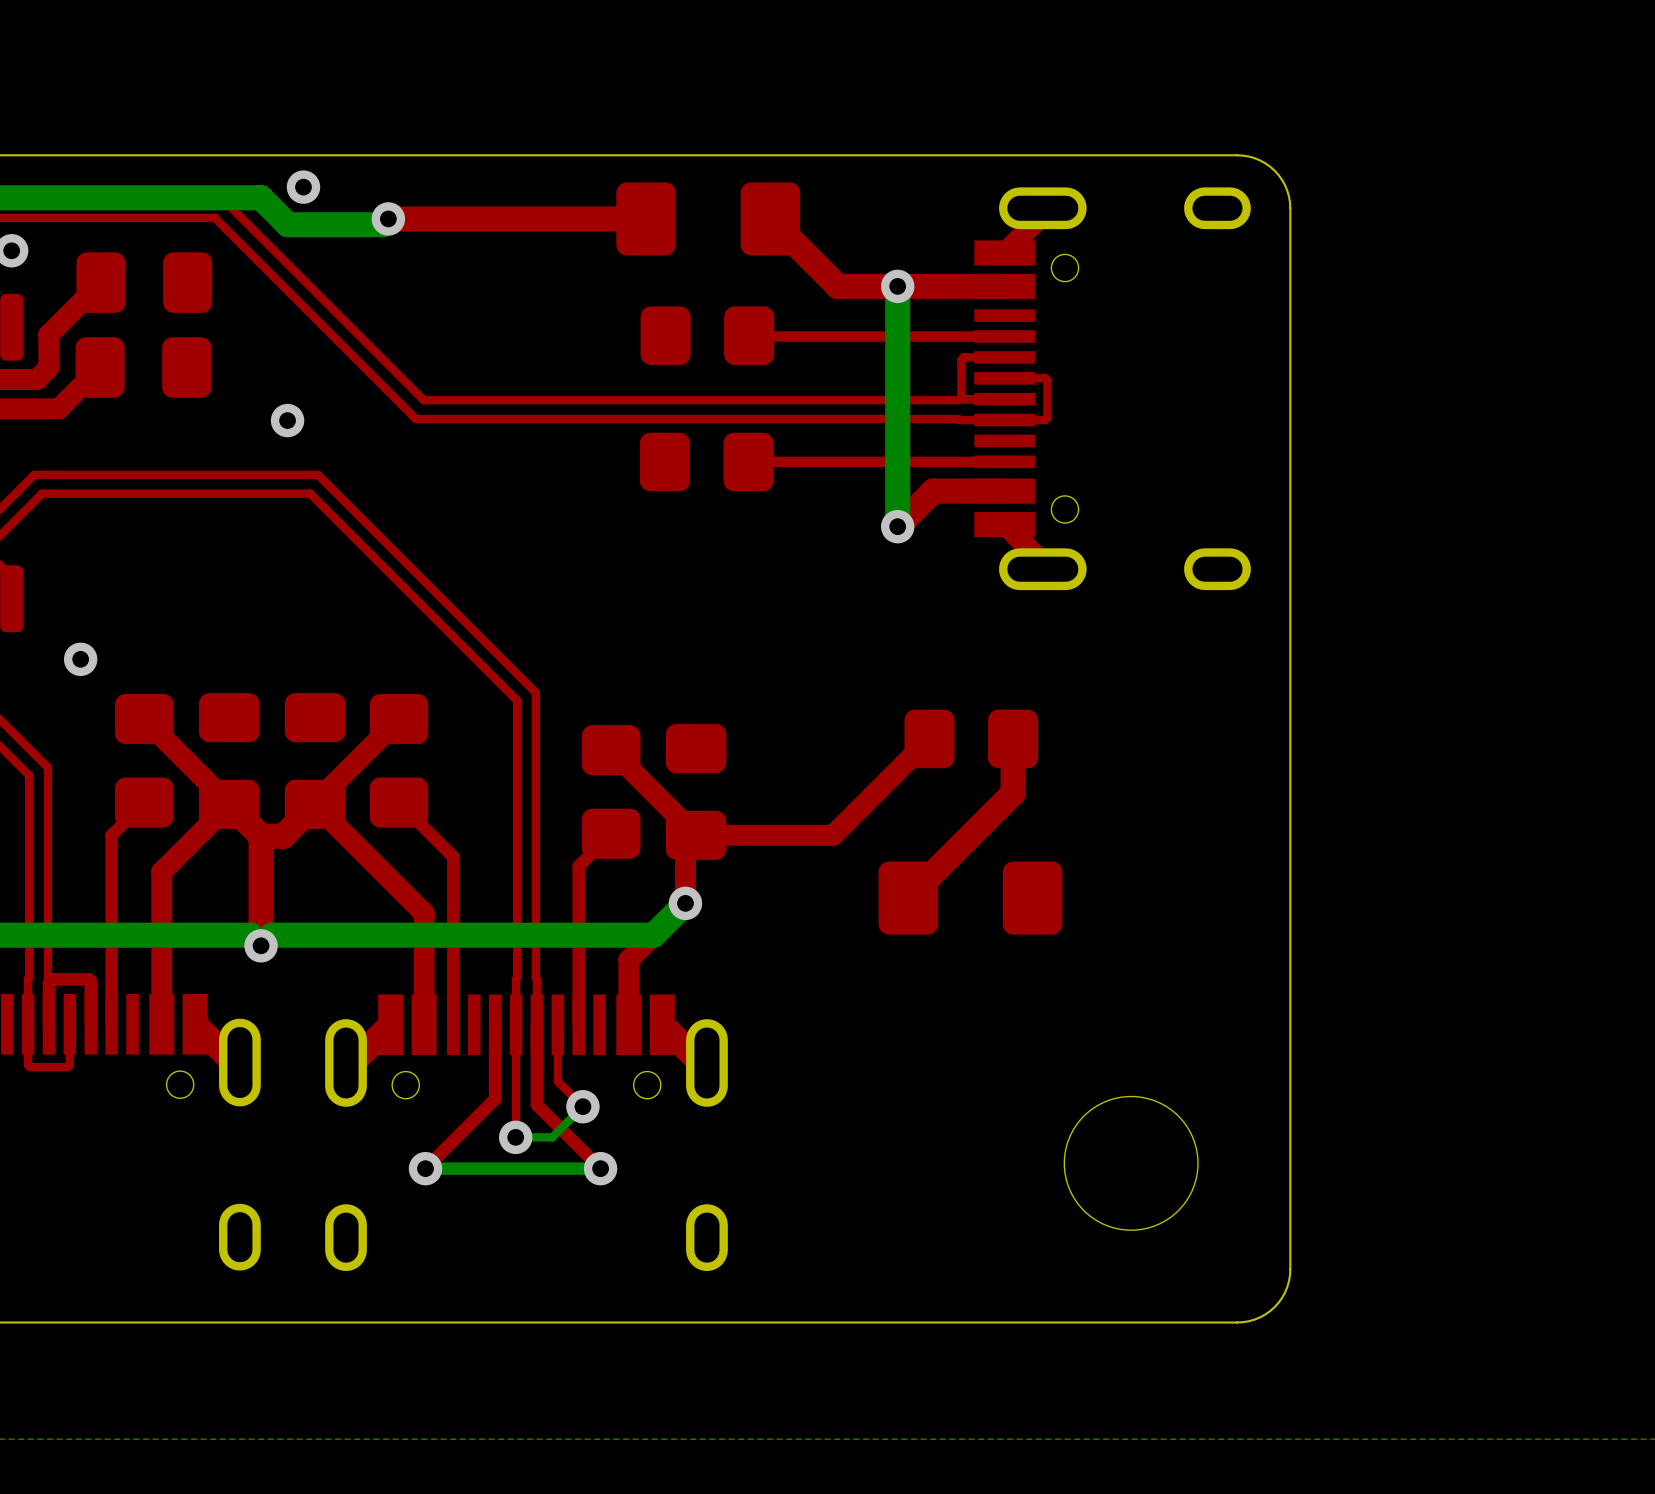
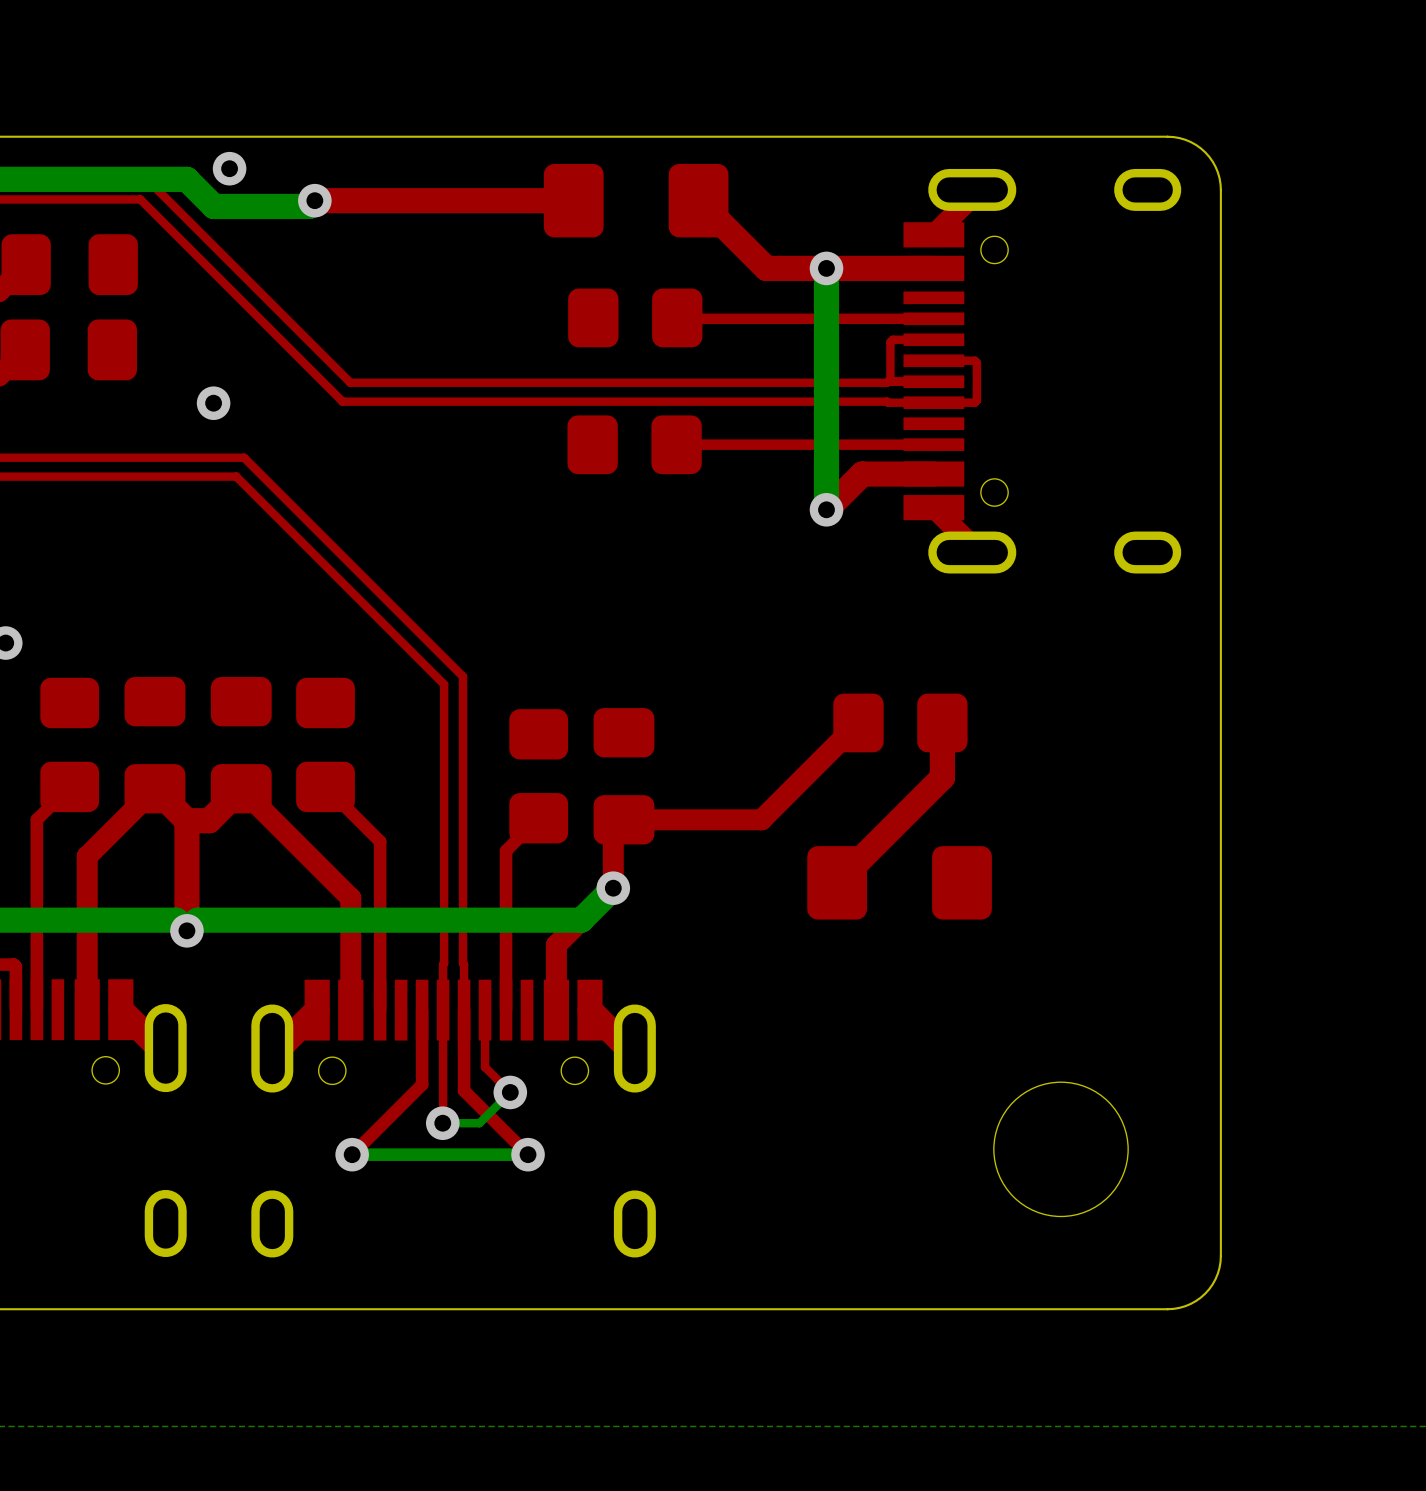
top track: (144, 719) (229, 803) -> none
top track: (398, 719) (315, 804) -> none
top track: (611, 750) (696, 835) -> none

